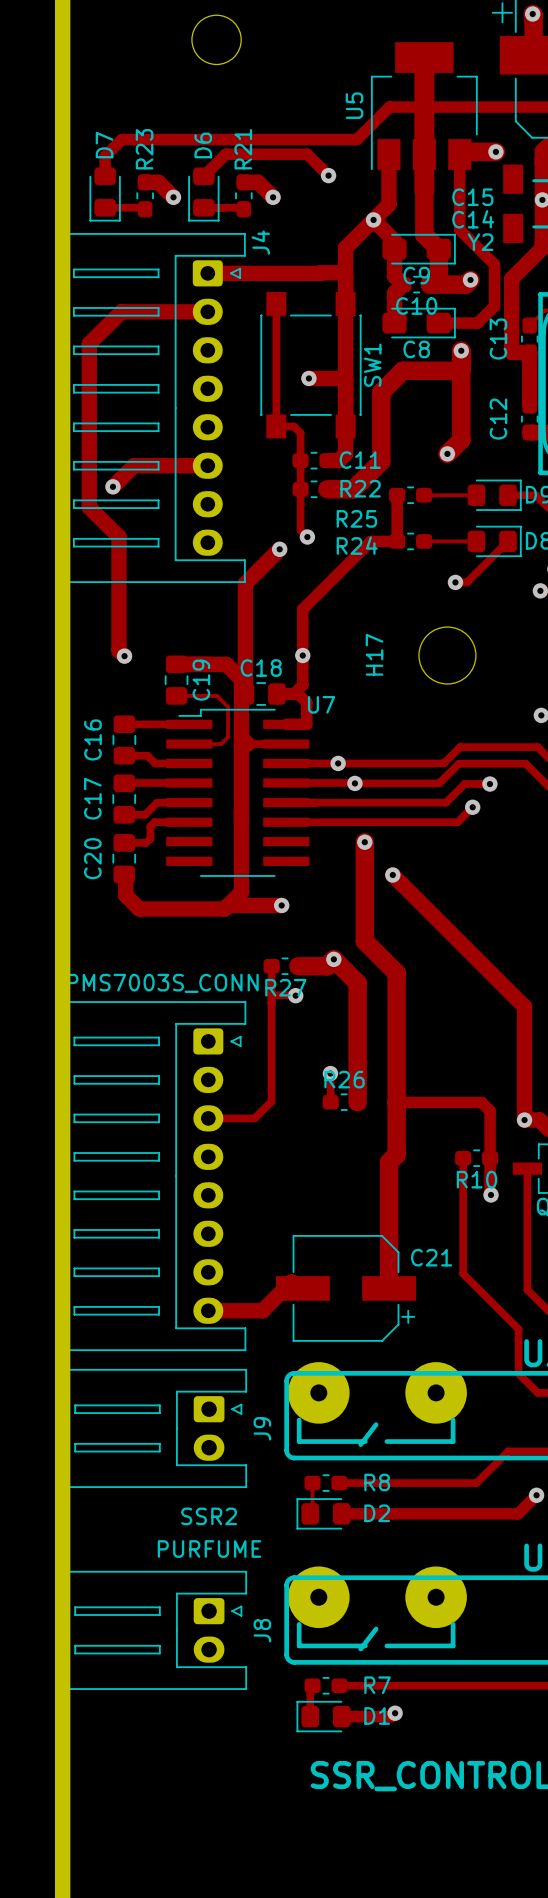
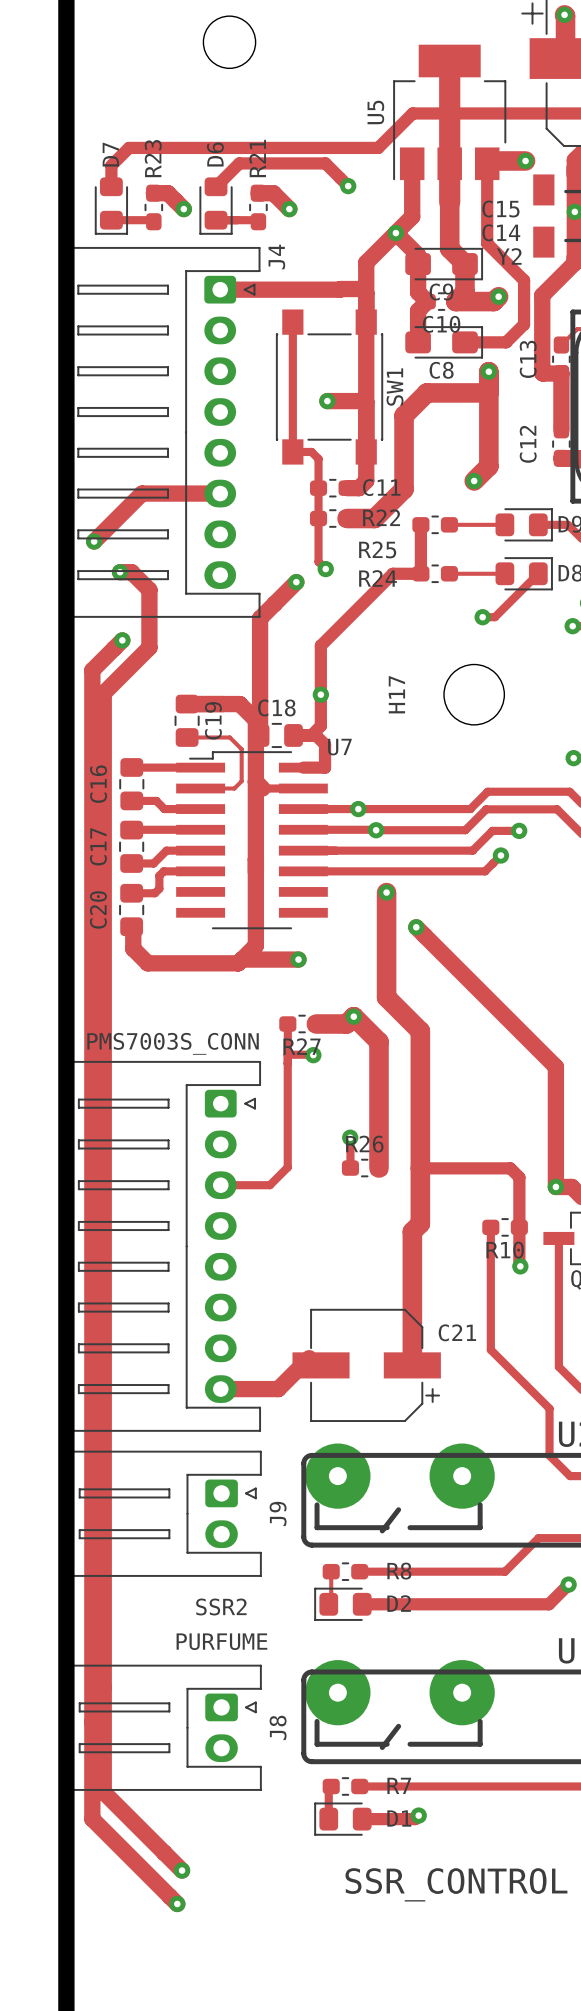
track: (207, 311) (121, 311) (89, 343) (89, 507) (118, 537) (118, 650) (124, 656) -> none
track: none -> (119, 515) (94, 541)
via: (112, 486) -> none
via: none -> (94, 541)
track: none -> (120, 572) (131, 572) (149, 590) (149, 647) (103, 693) (103, 1792) (182, 1870)
via: none -> (120, 572)
track: none -> (122, 640) (92, 670) (92, 1819) (177, 1903)
via position: (124, 656) -> (122, 640)
via: none -> (182, 1870)
via: none -> (177, 1903)

